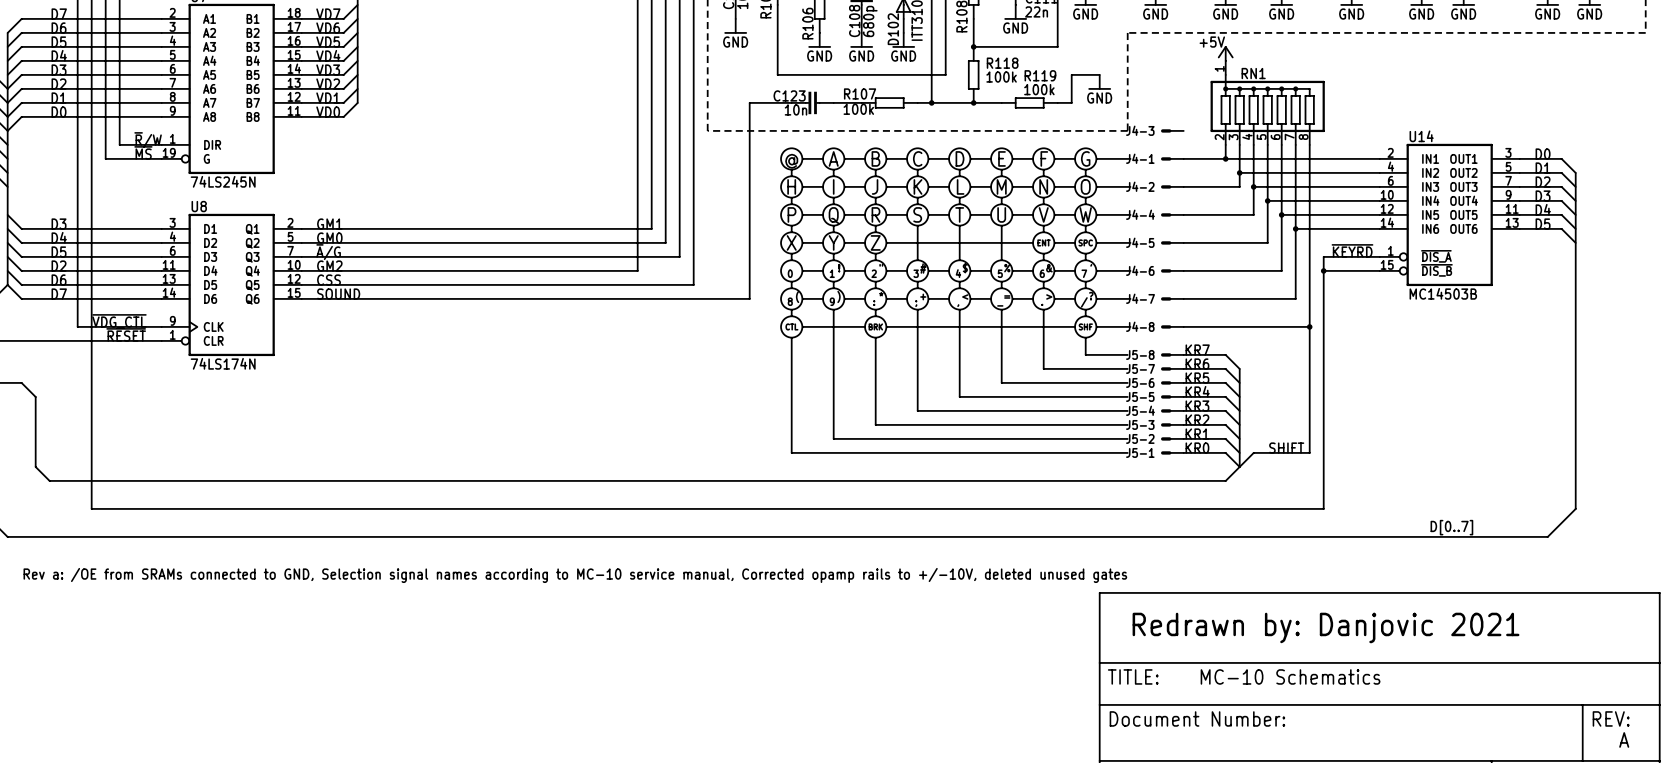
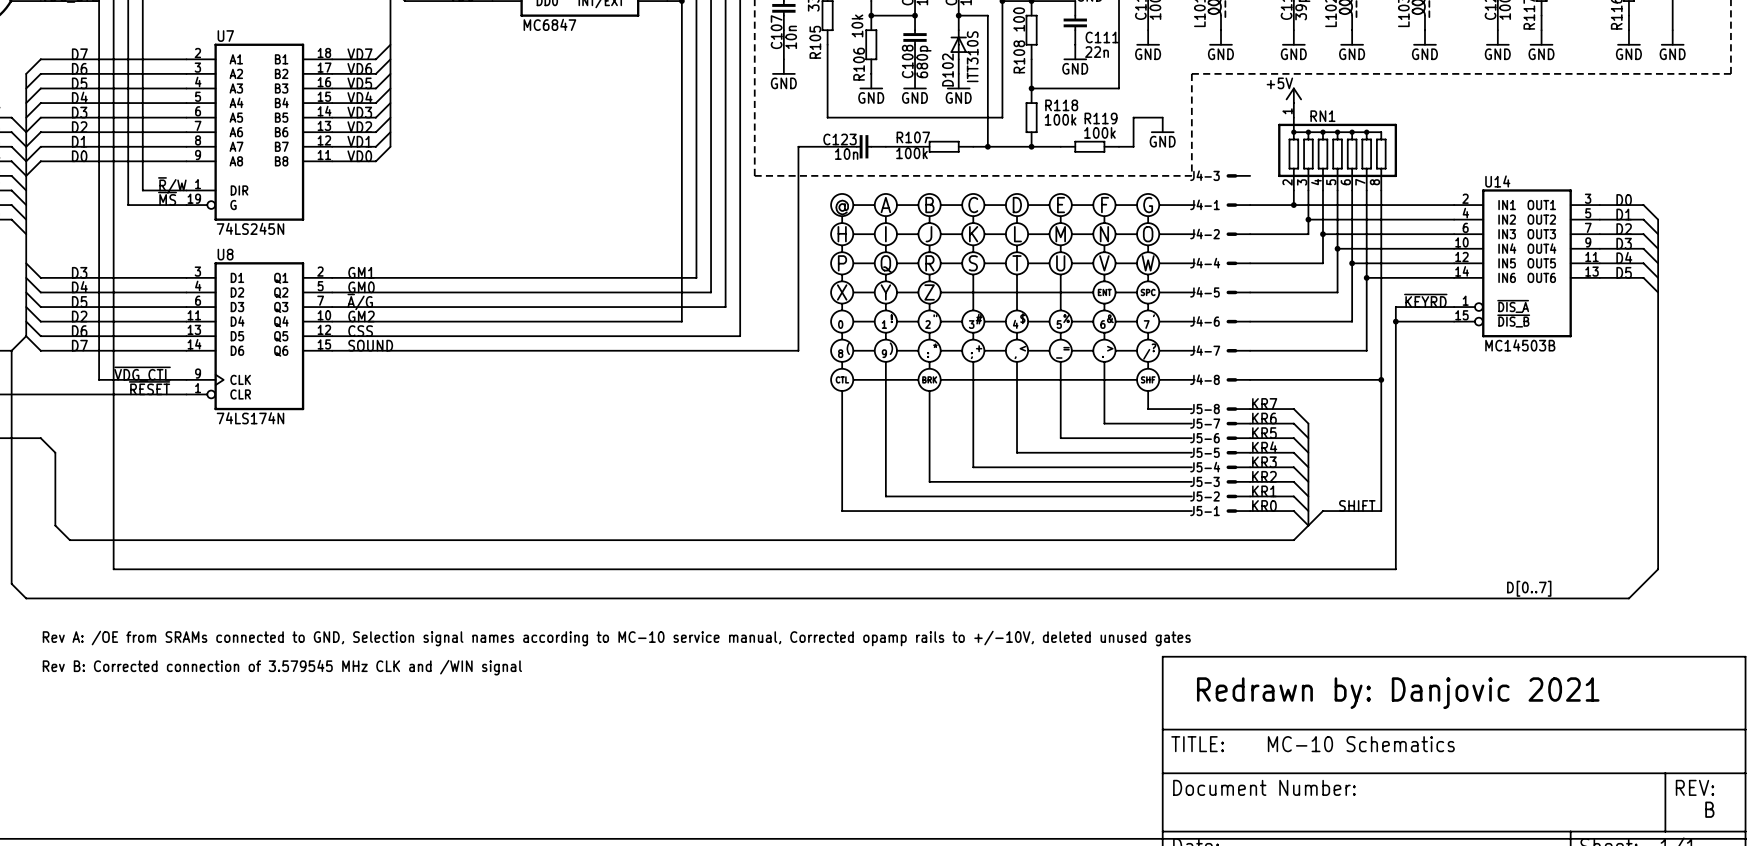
text: Rev a: /OE from SRAMs connected to GND, Selection signal names according to MC-10 service manual, Corrected opamp rails to +/-10V, deleted unused gates (575, 575) -> Rev A: /OE from SRAMs connected to GND, Selection signal names according to MC-10 service manual, Corrected opamp rails to +/-10V, deleted unused gates (616, 638)
text: none -> Rev B: Corrected connection of 3.579545 MHz CLK and /WIN signal (282, 667)
text: A (1624, 739) -> B (1709, 809)

